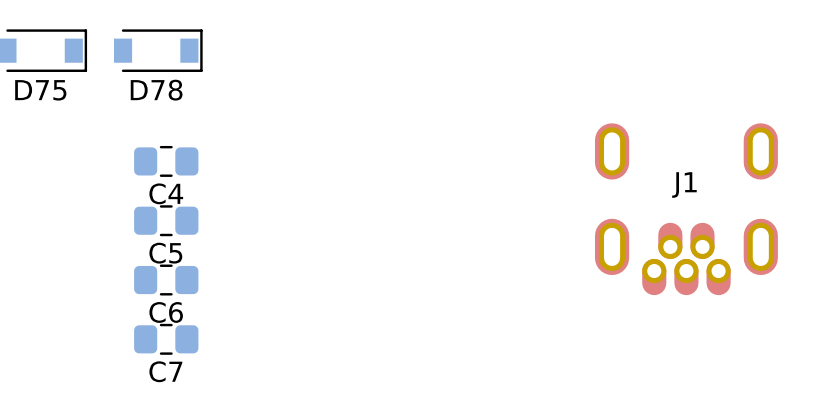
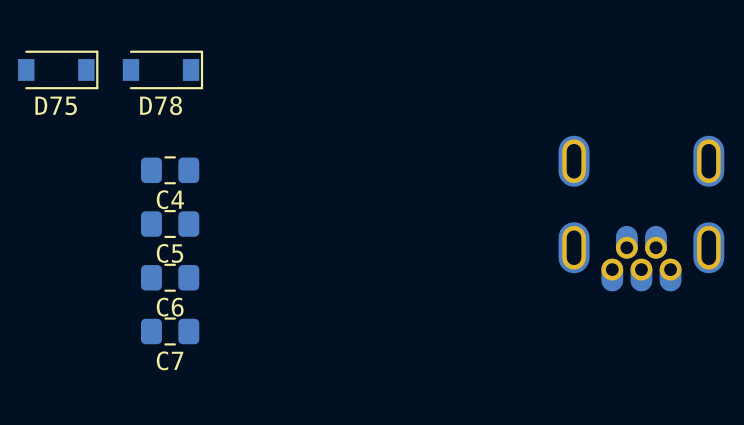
J1 side: bottom (686, 209) -> top (641, 213)

